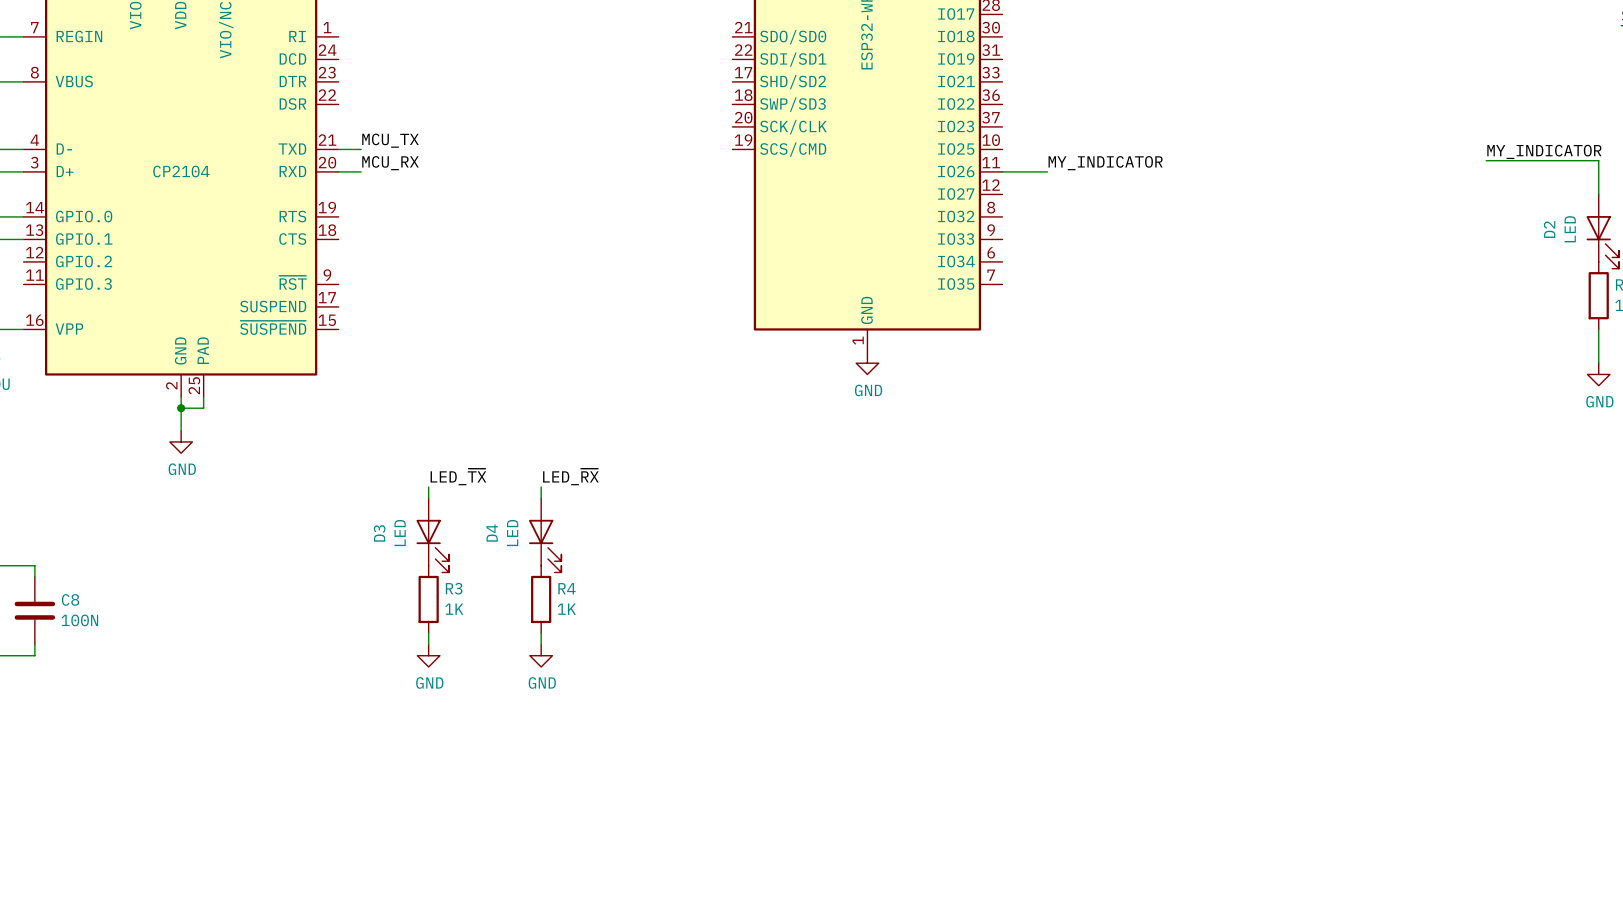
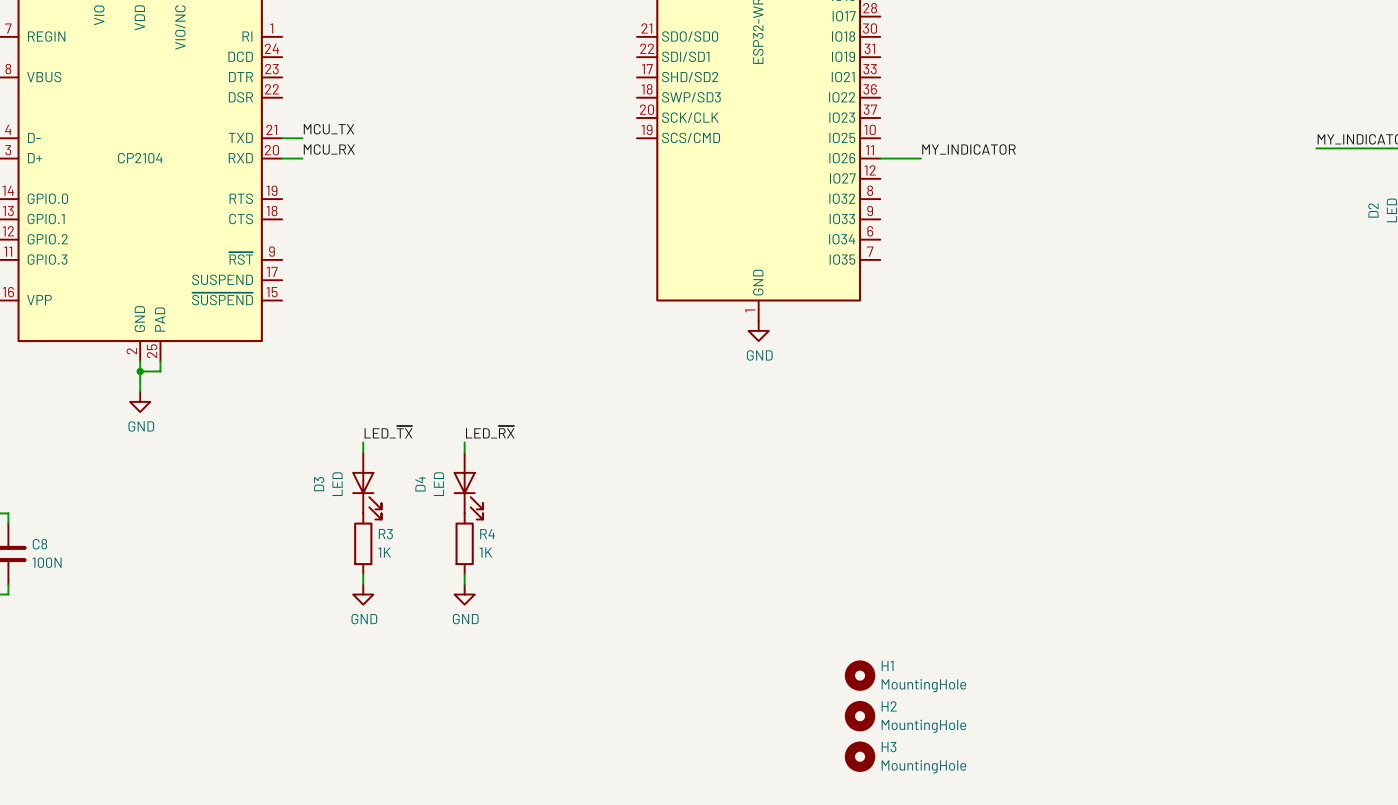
H1: none -> MountingHole (860, 675)
H2: none -> MountingHole (860, 716)
H3: none -> MountingHole (860, 756)

